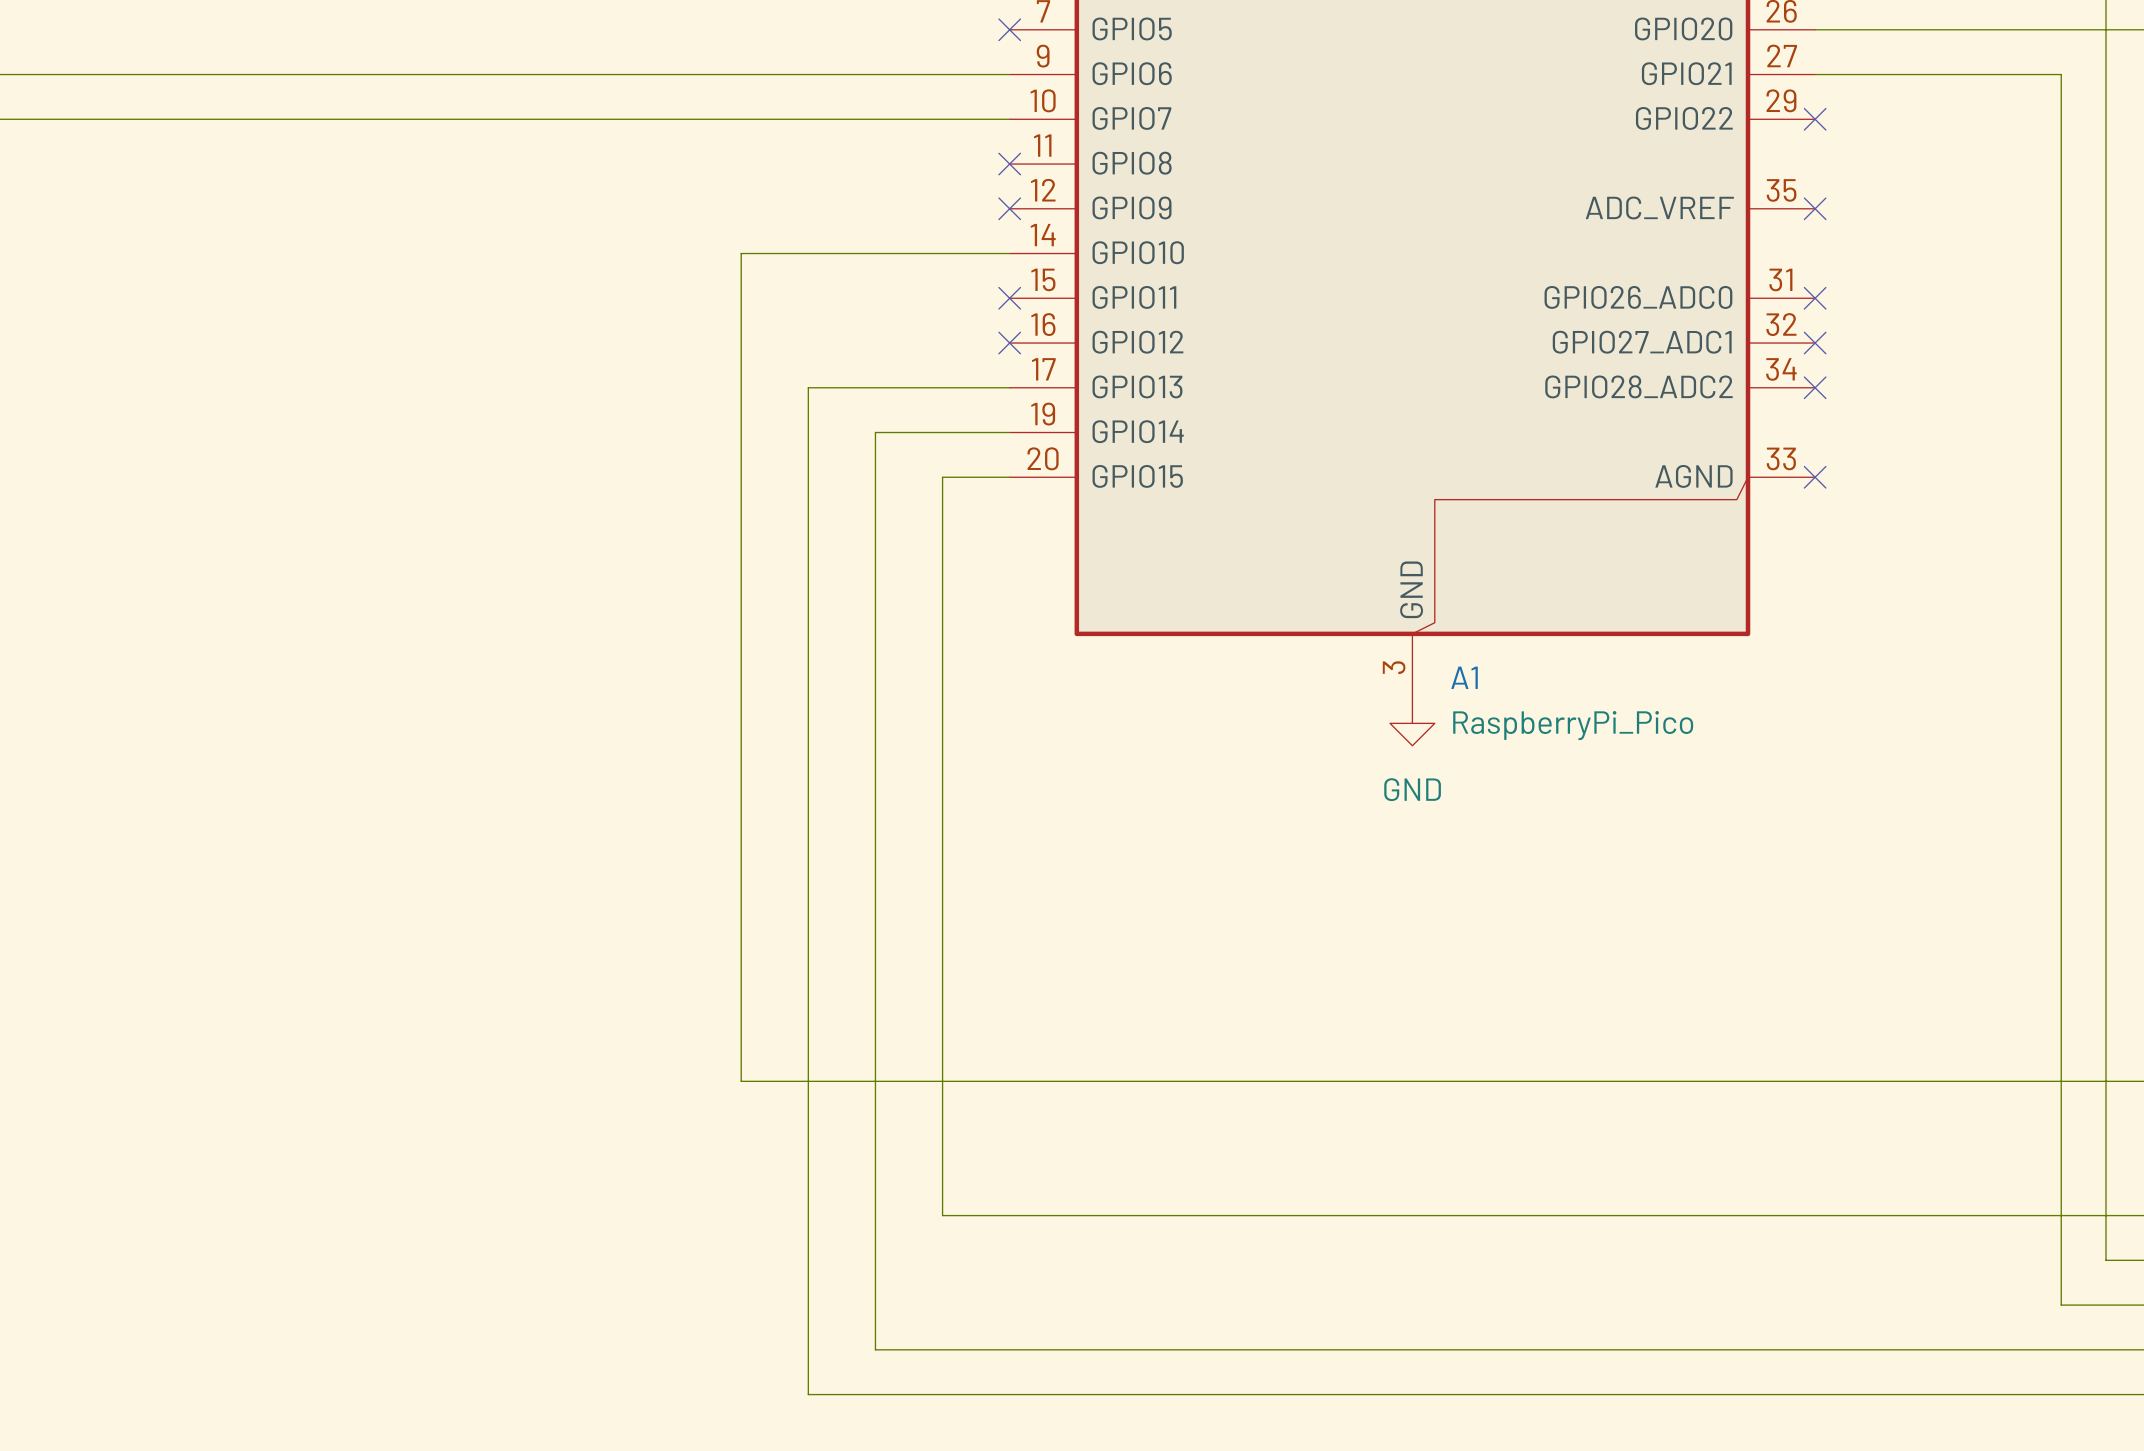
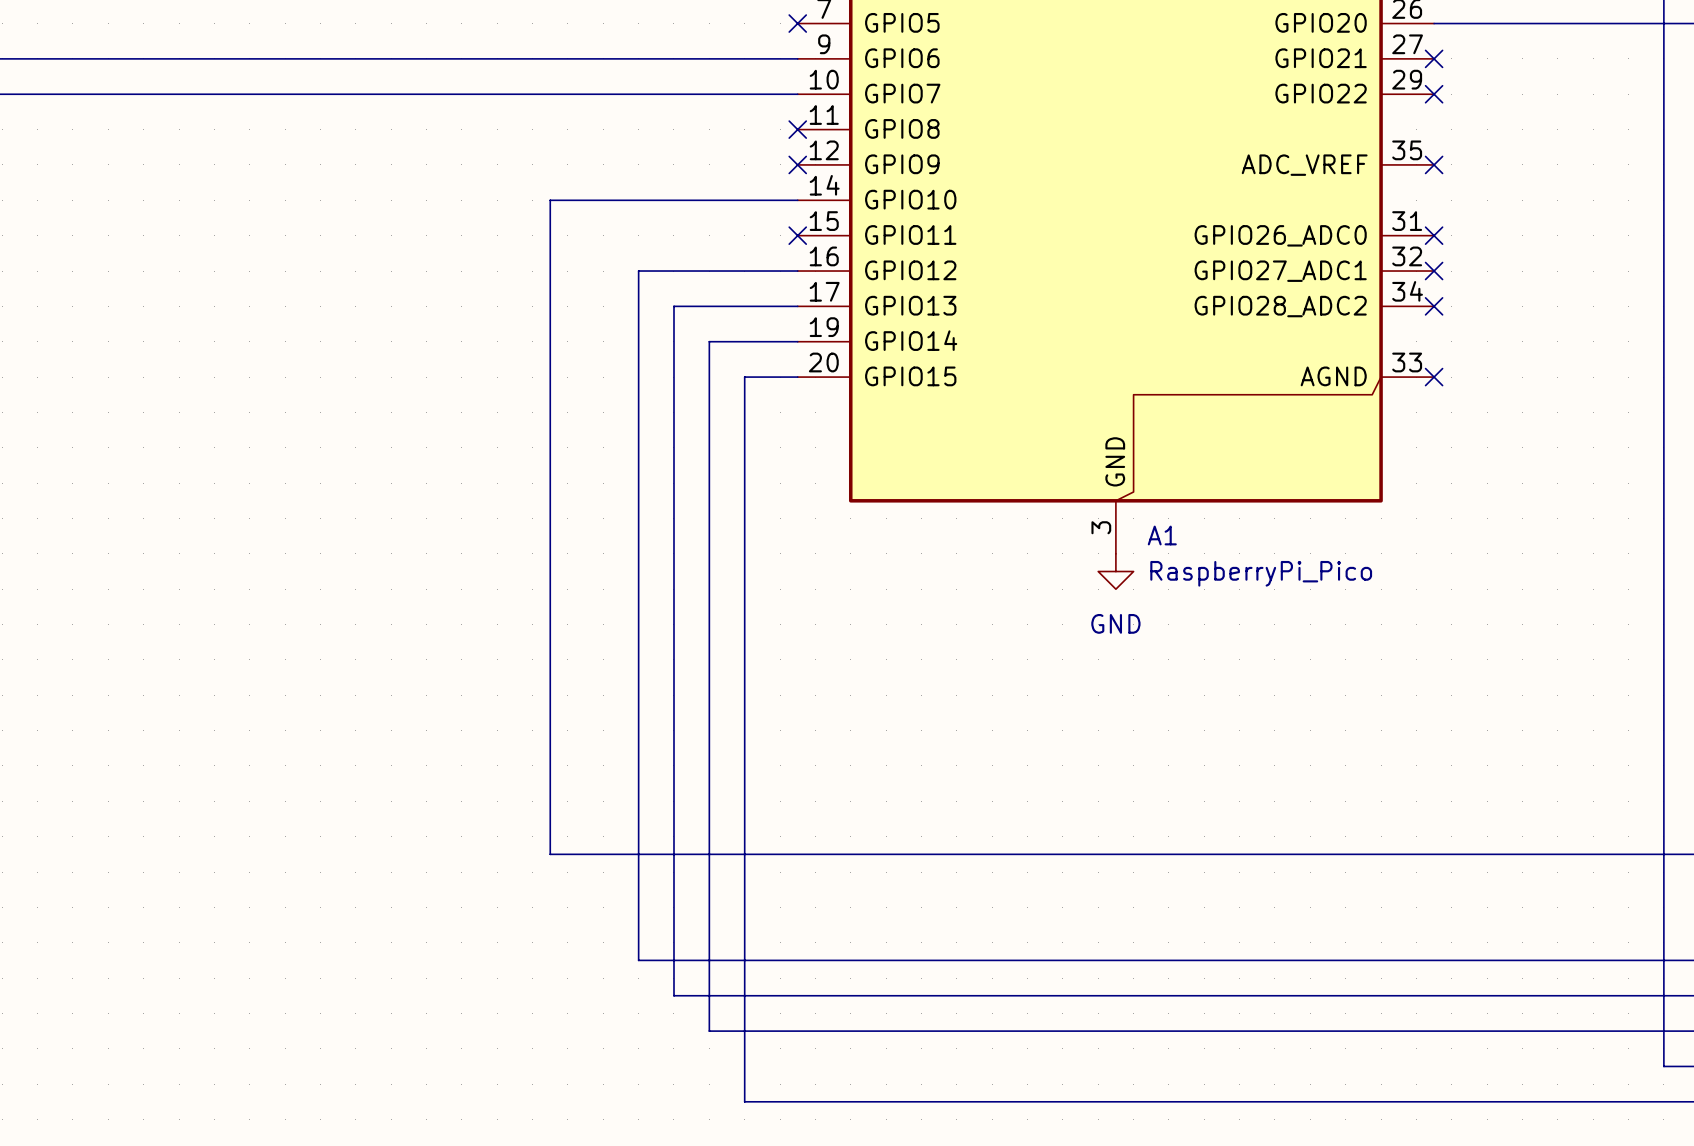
wire: (1815, 74) (2061, 74) (2061, 1305) -> (709, 341) (709, 1031) (1628, 1031)
no-connect mark: none -> (1434, 58)
wire: (741, 253) (741, 1081) -> (585, 200) (550, 200) (550, 854) (585, 854)
no-connect mark: (1009, 343) -> none
wire: (808, 387) (853, 387) -> (638, 306) (638, 271) (797, 271)
wire: (897, 432) (875, 432) (875, 1349) (2105, 1349) -> (673, 306) (673, 995) (1663, 995) (1663, 1066)
wire: (808, 1215) (808, 1394) (942, 1394) -> (638, 960) (744, 960) (744, 1101)

